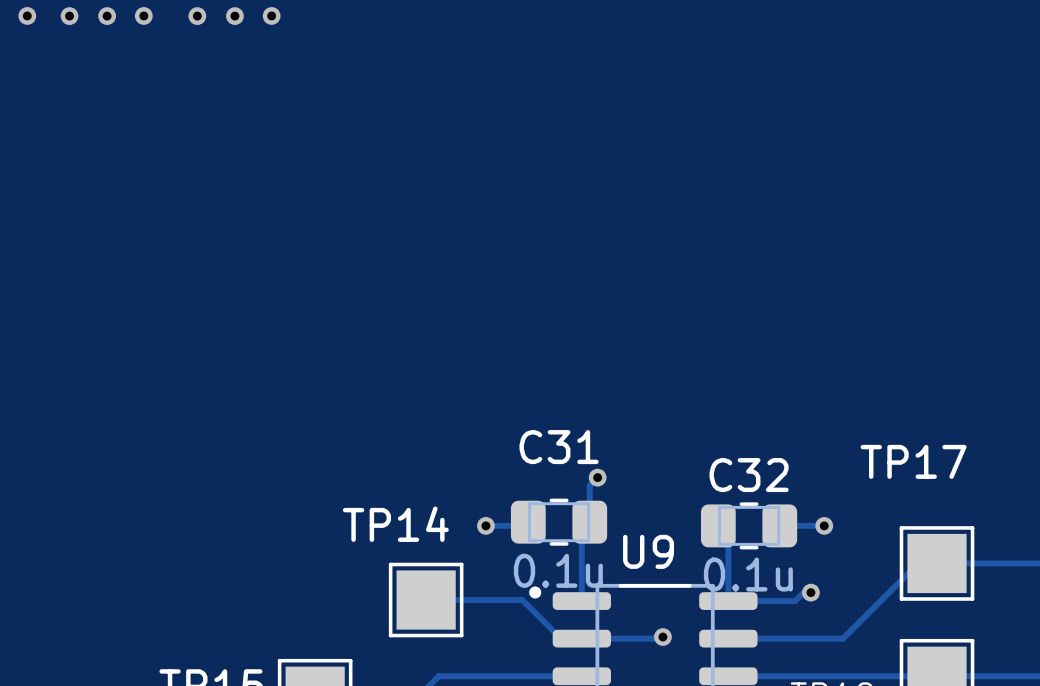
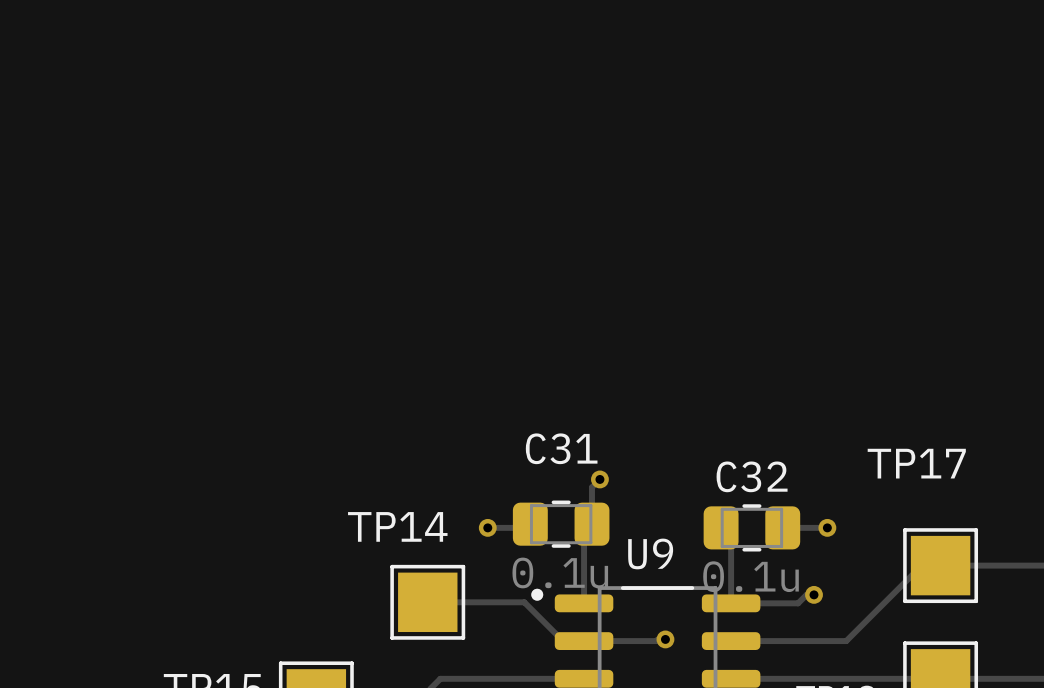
via: (27, 15) -> none
via: (143, 15) -> none
via: (271, 15) -> none
via: (69, 16) -> none
via: (107, 16) -> none
via: (197, 16) -> none
via: (234, 16) -> none

